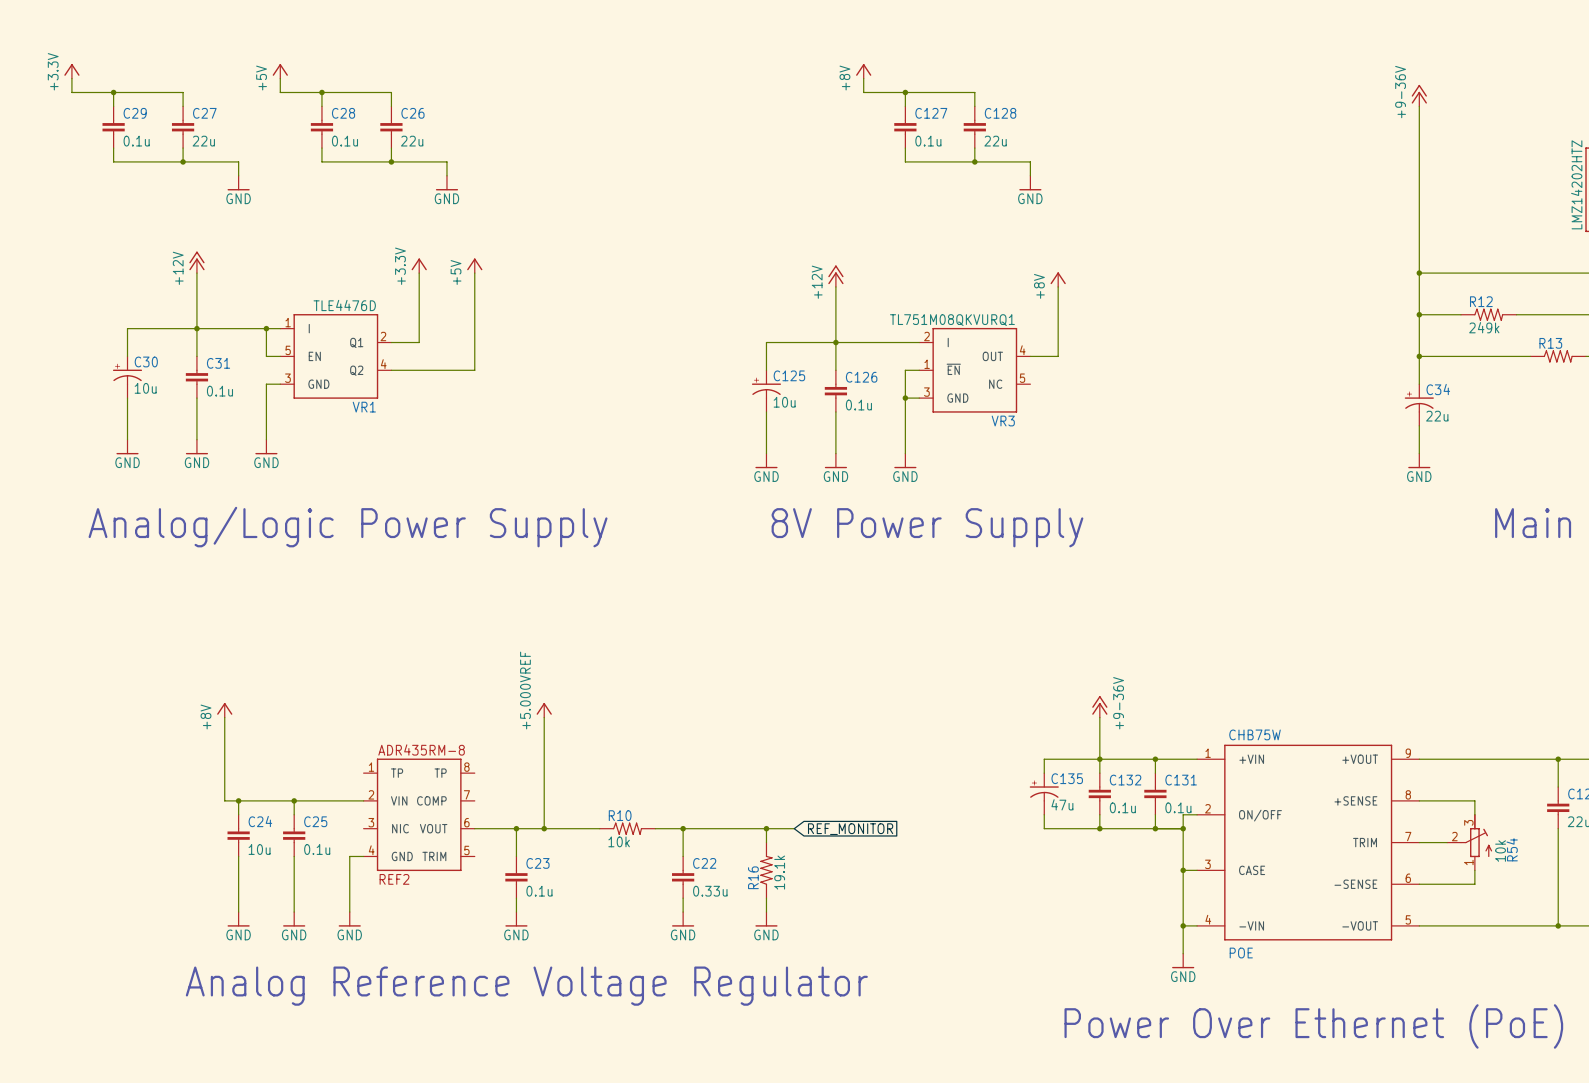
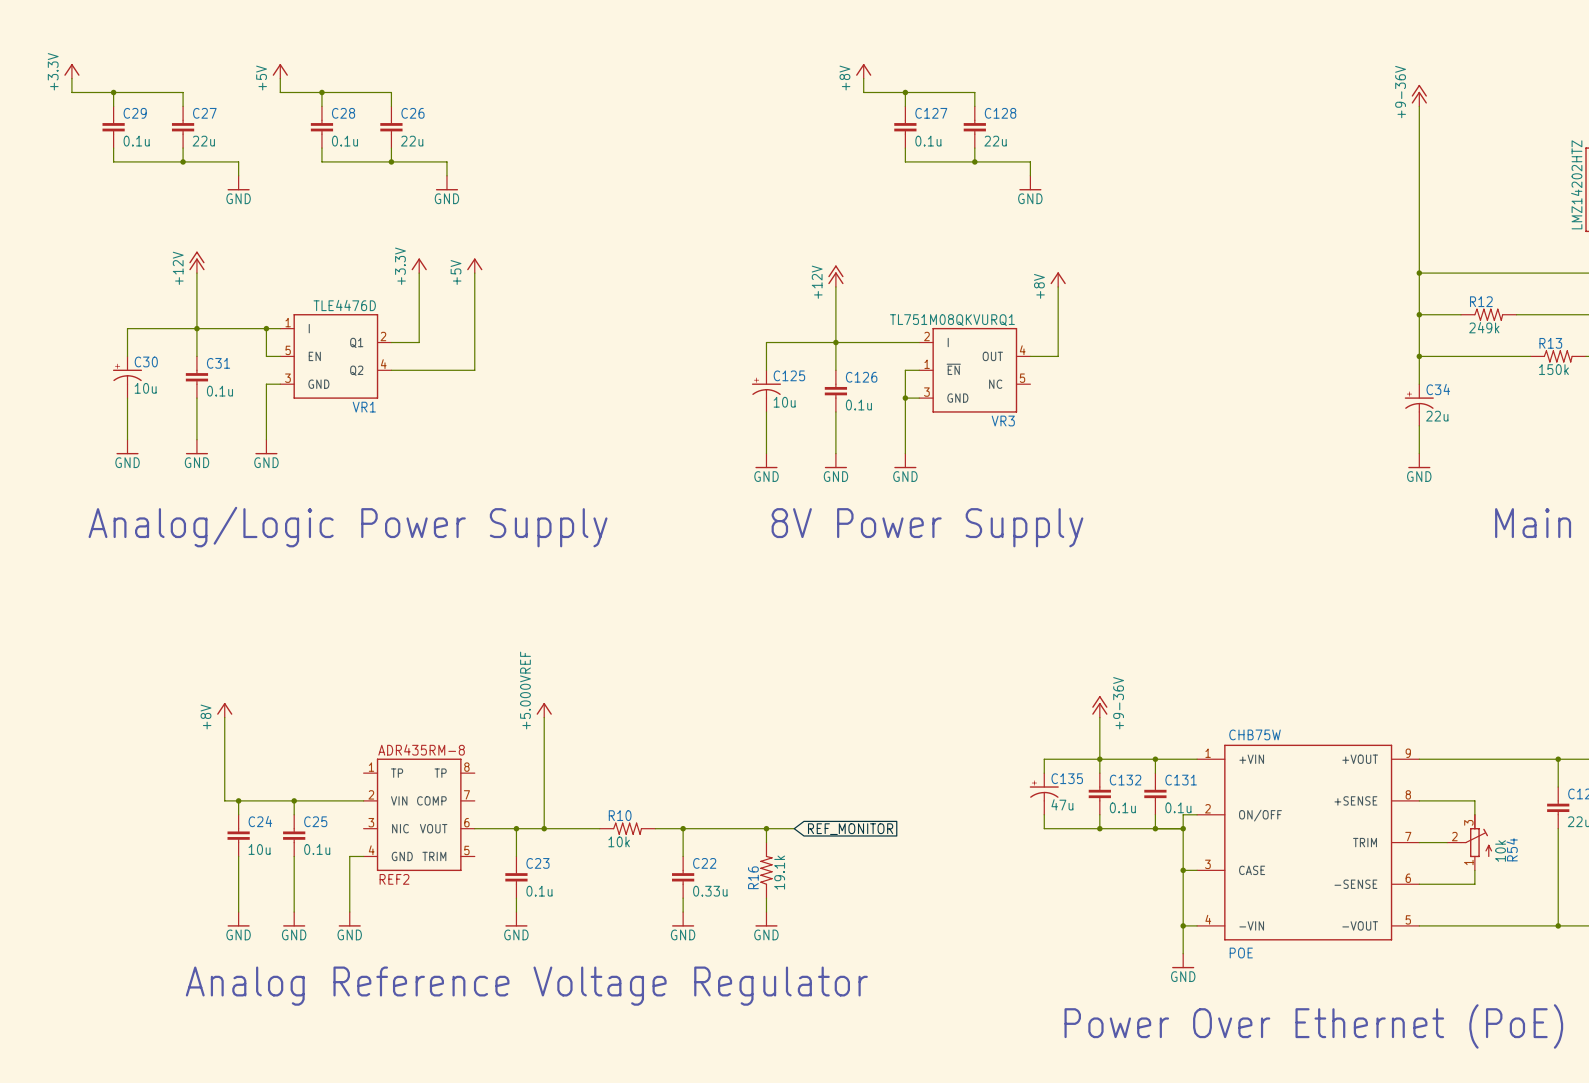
R13 value: none -> 150k (1553, 369)

